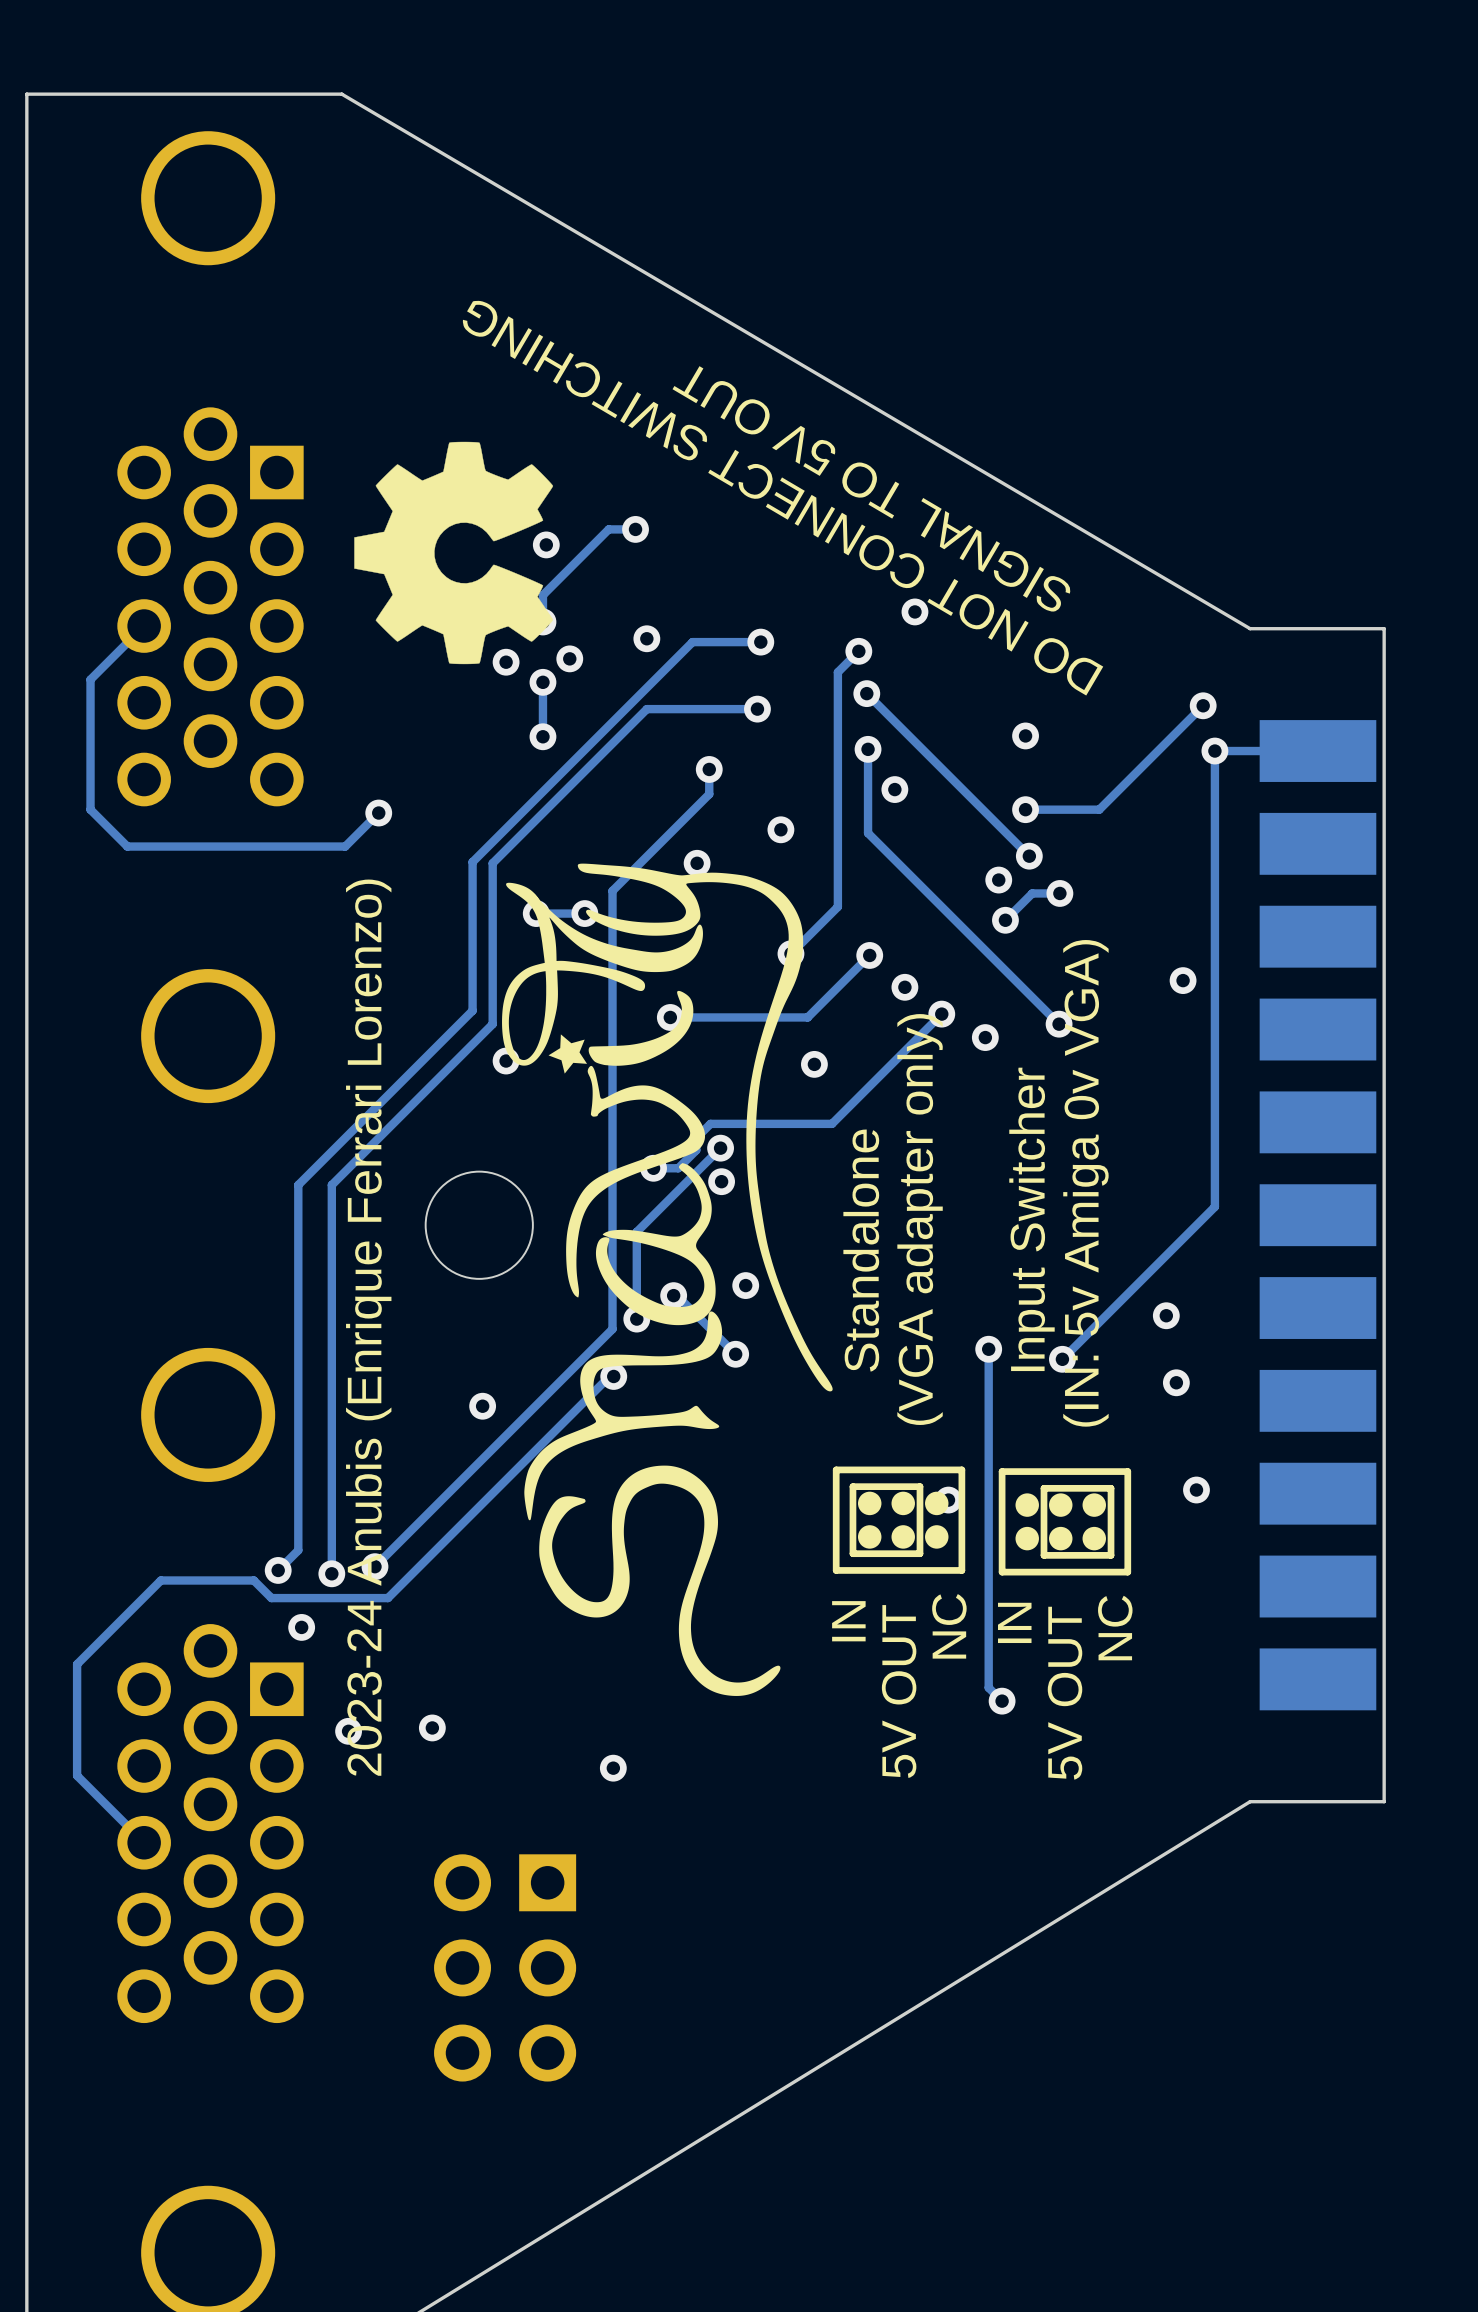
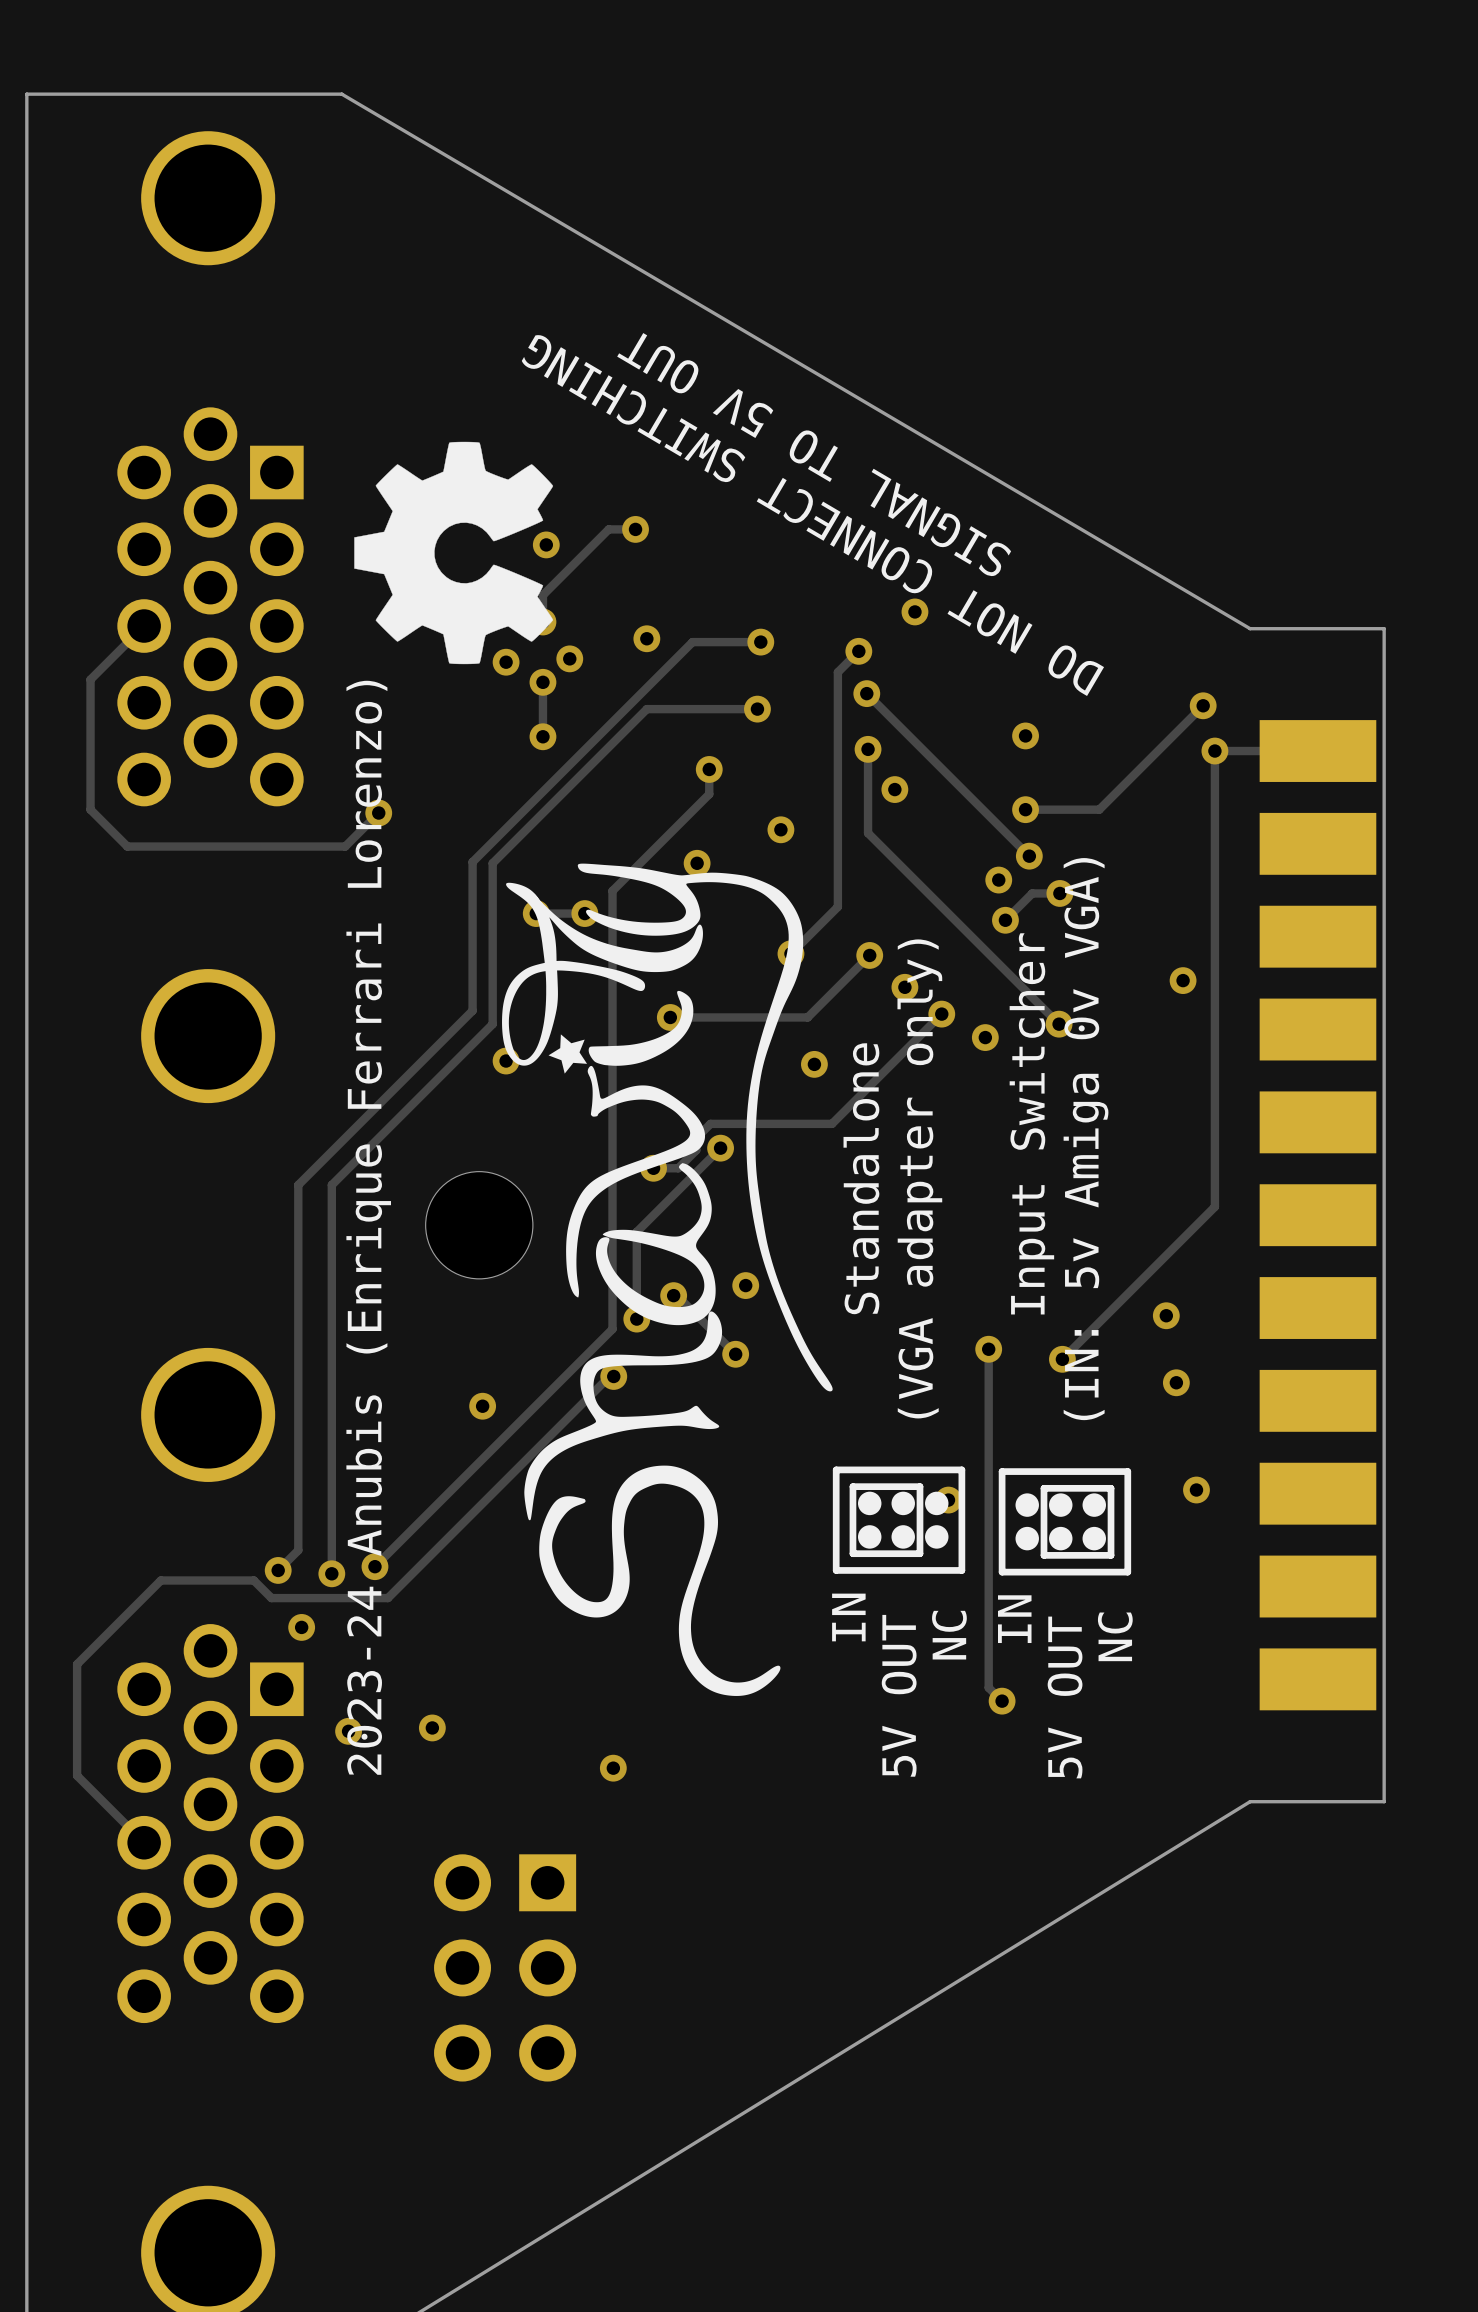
via: (721, 1181) -> none

